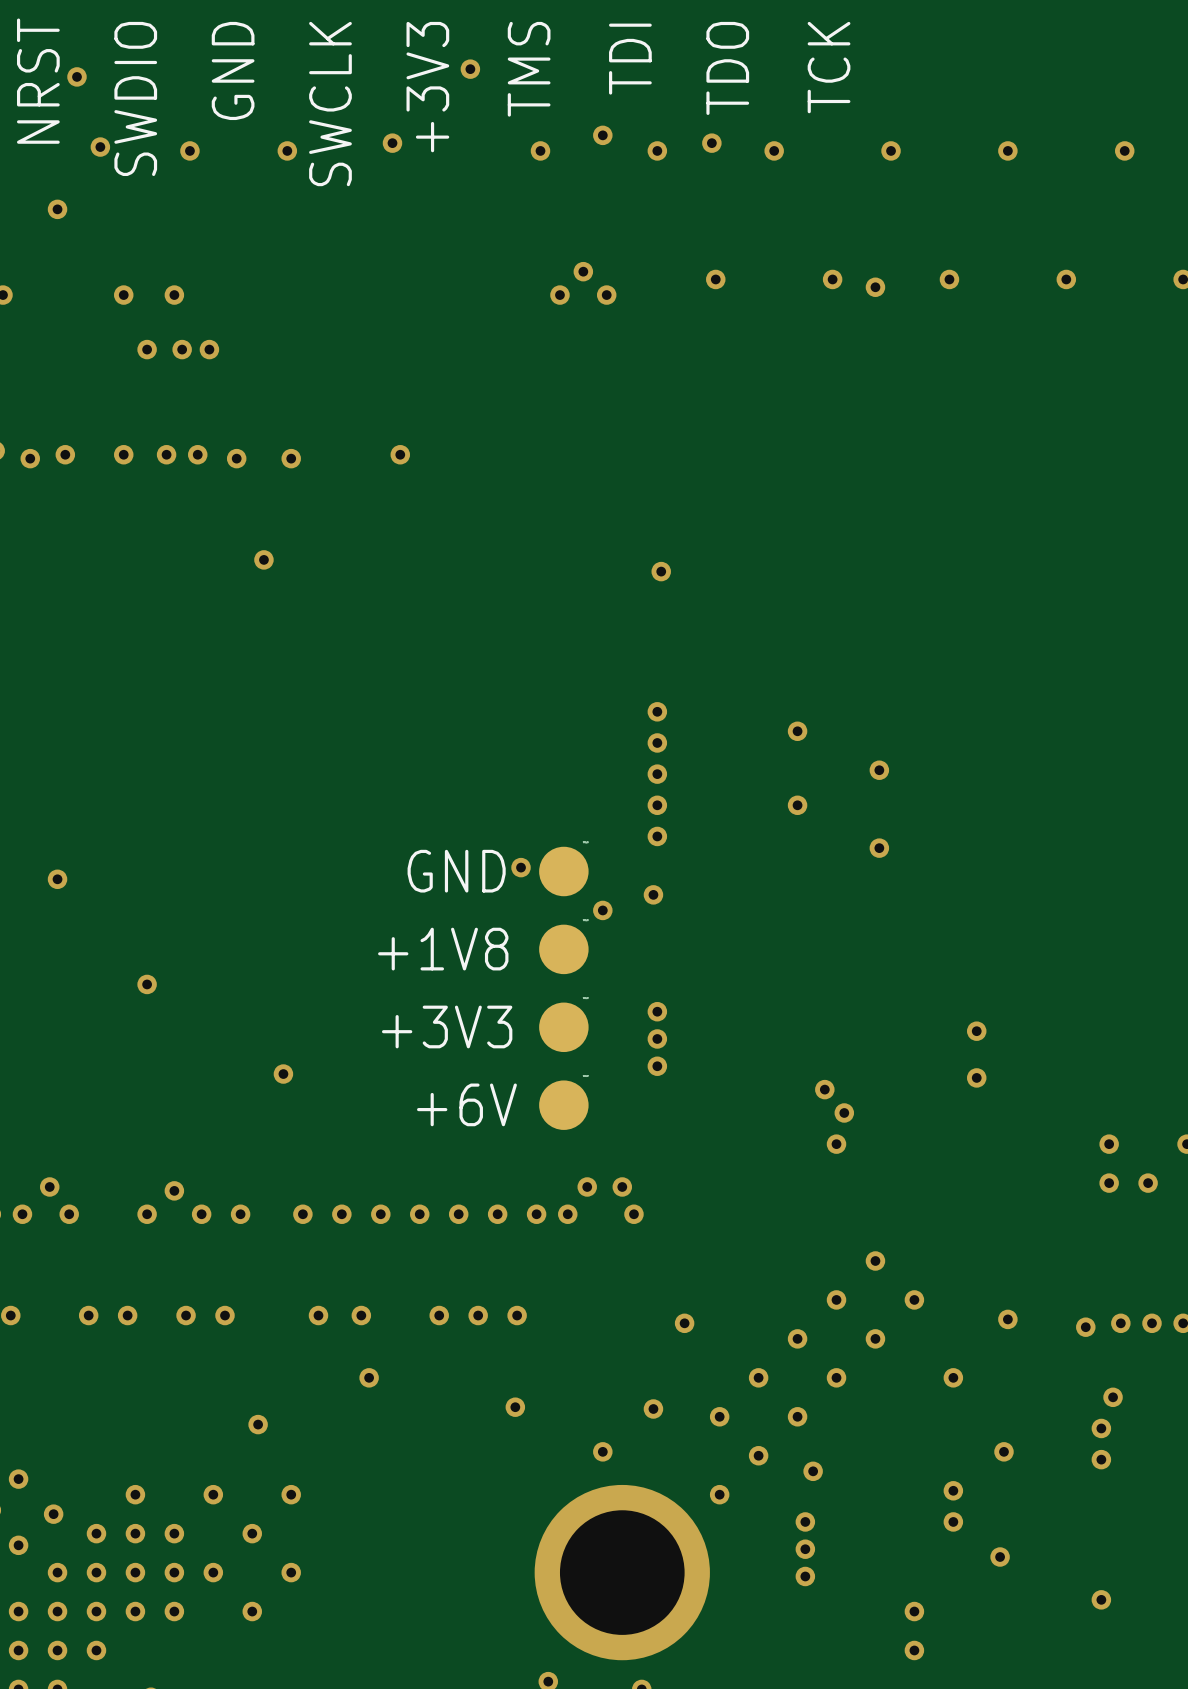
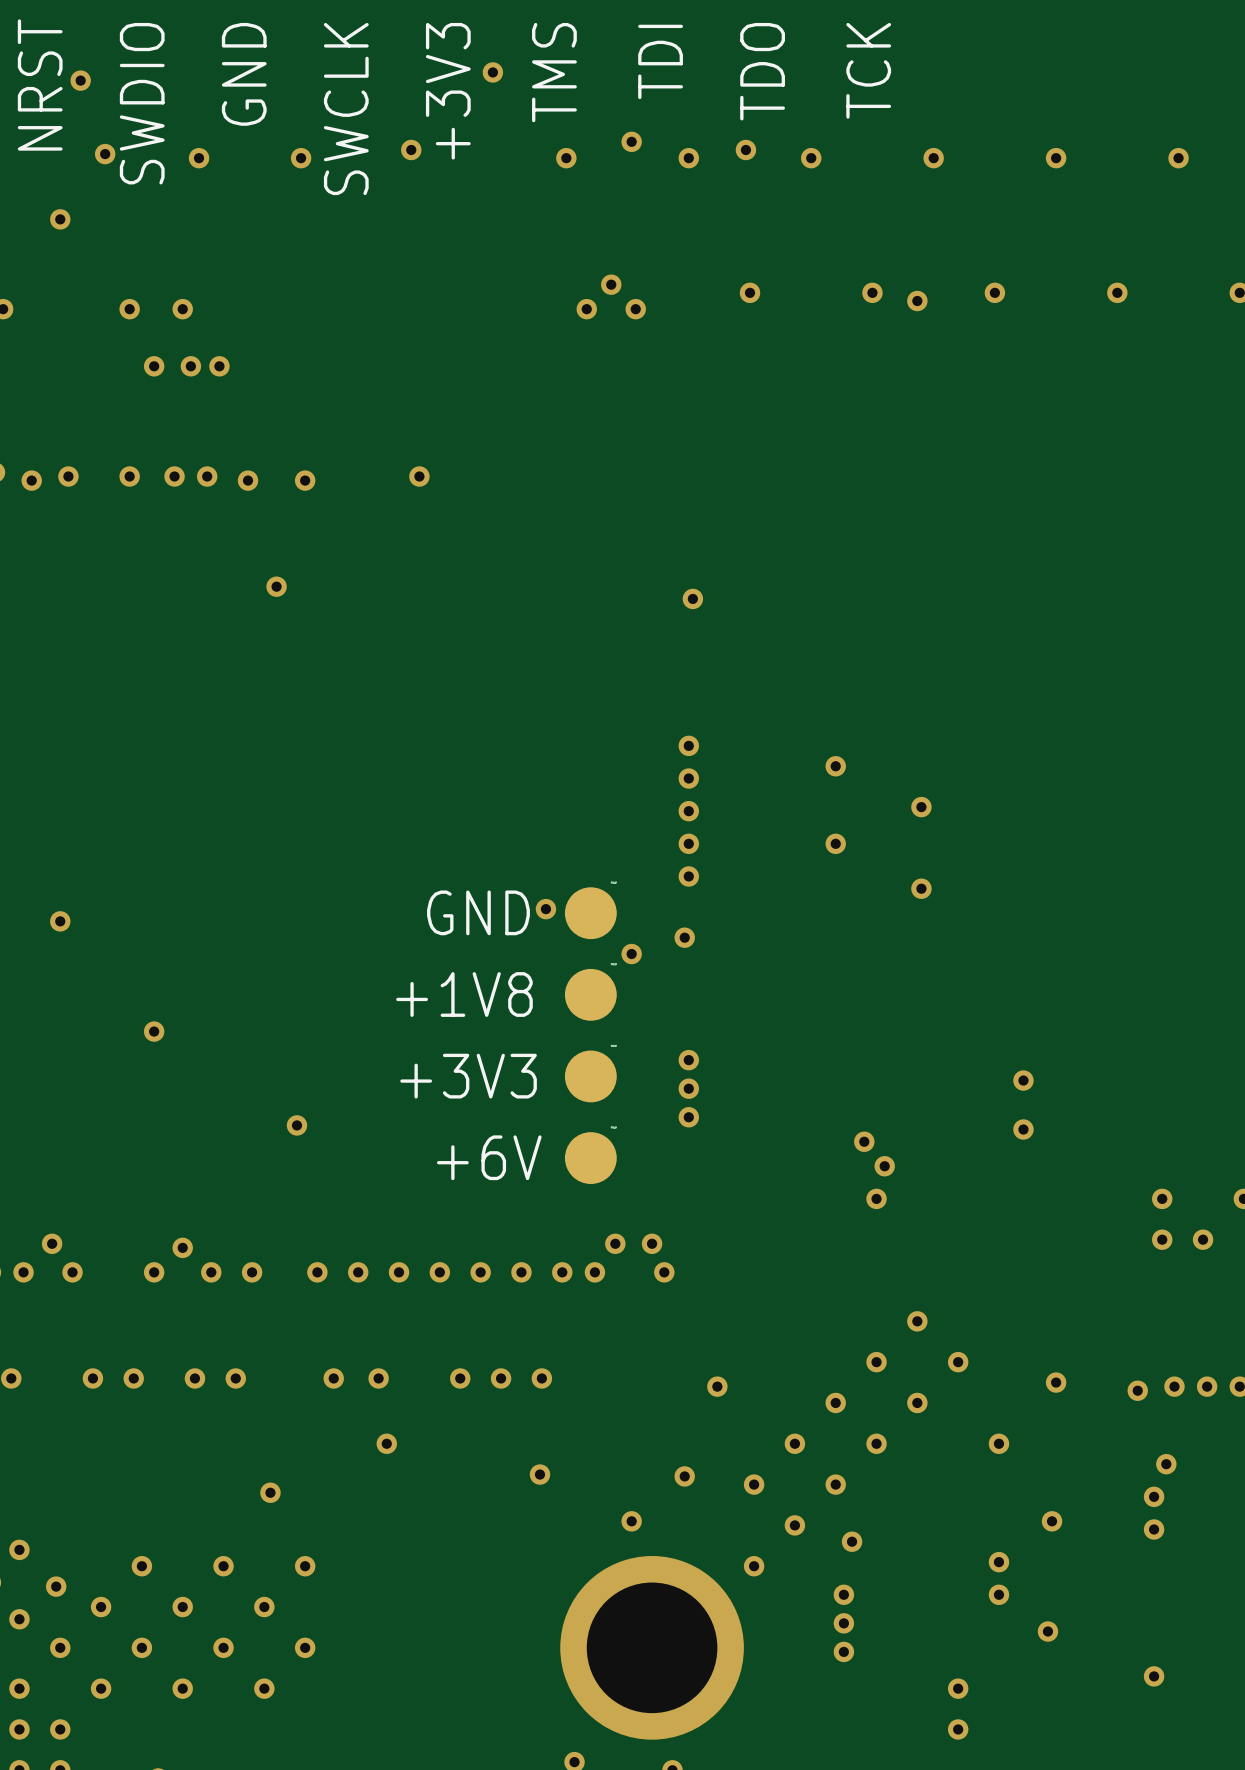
via: (135, 1533) -> none
via: (96, 1572) -> none
via: (174, 1572) -> none
via: (57, 1611) -> none
via: (135, 1611) -> none
via: (96, 1650) -> none

